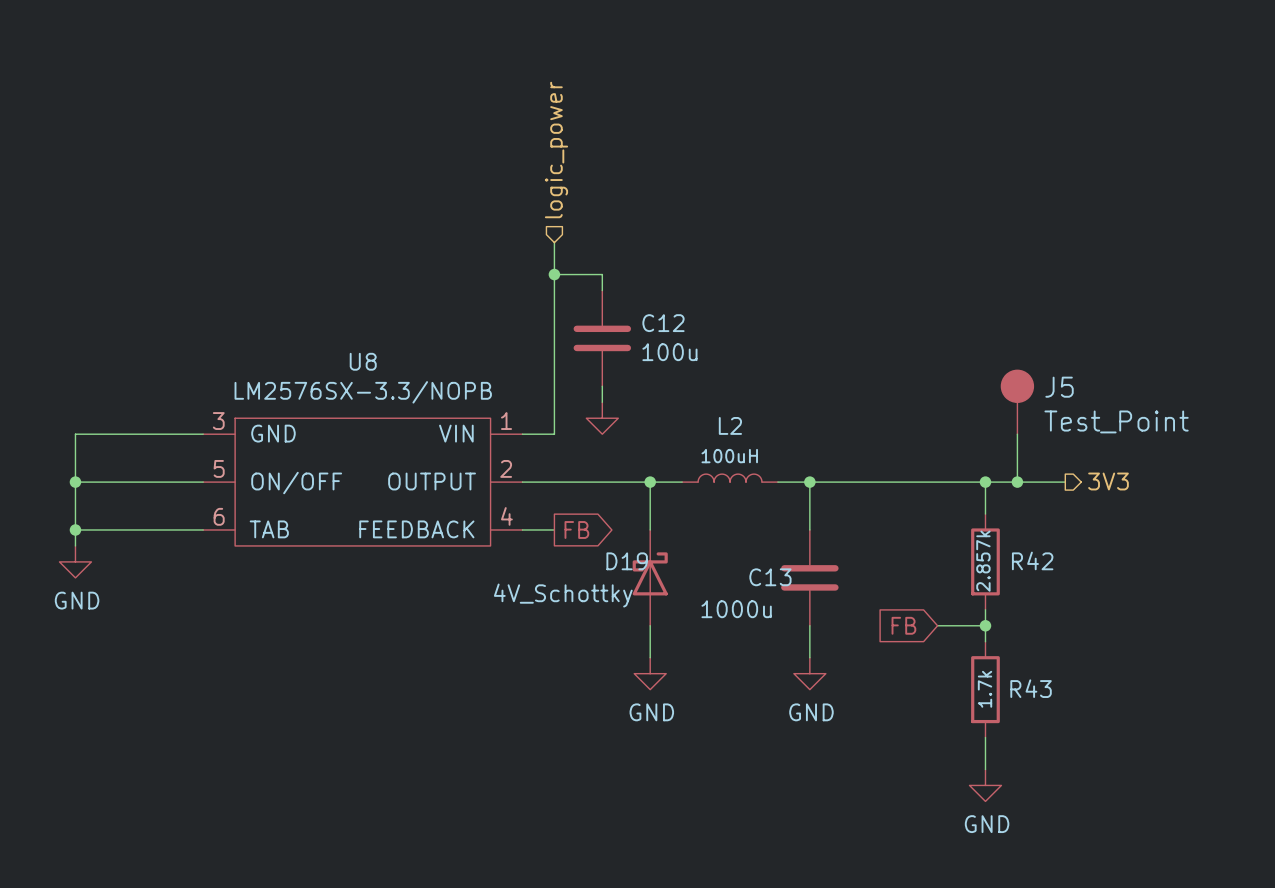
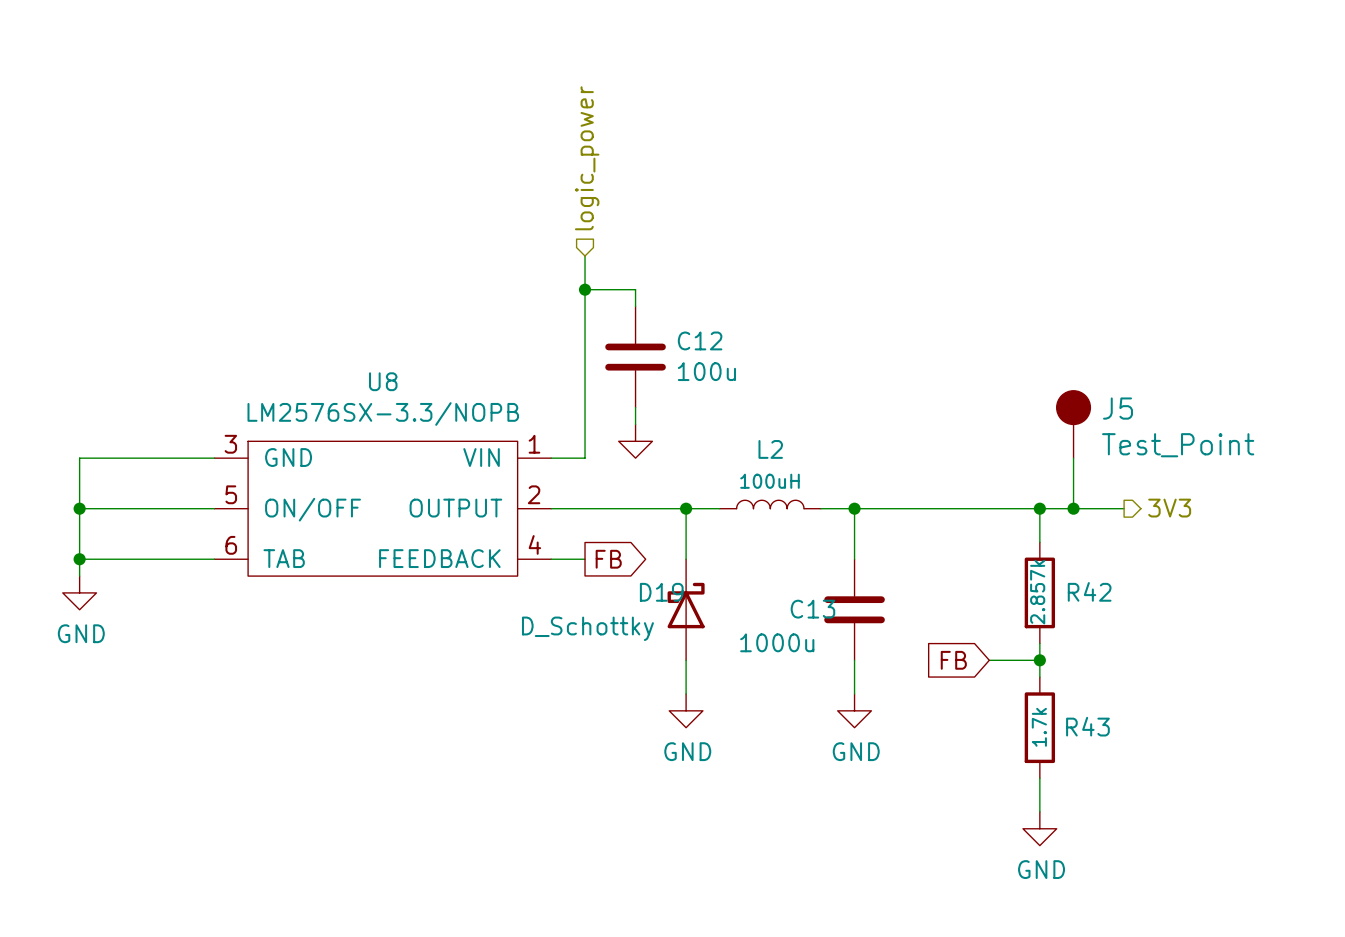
D19 value: 4V_Schottky (563, 595) -> D_Schottky (587, 628)

